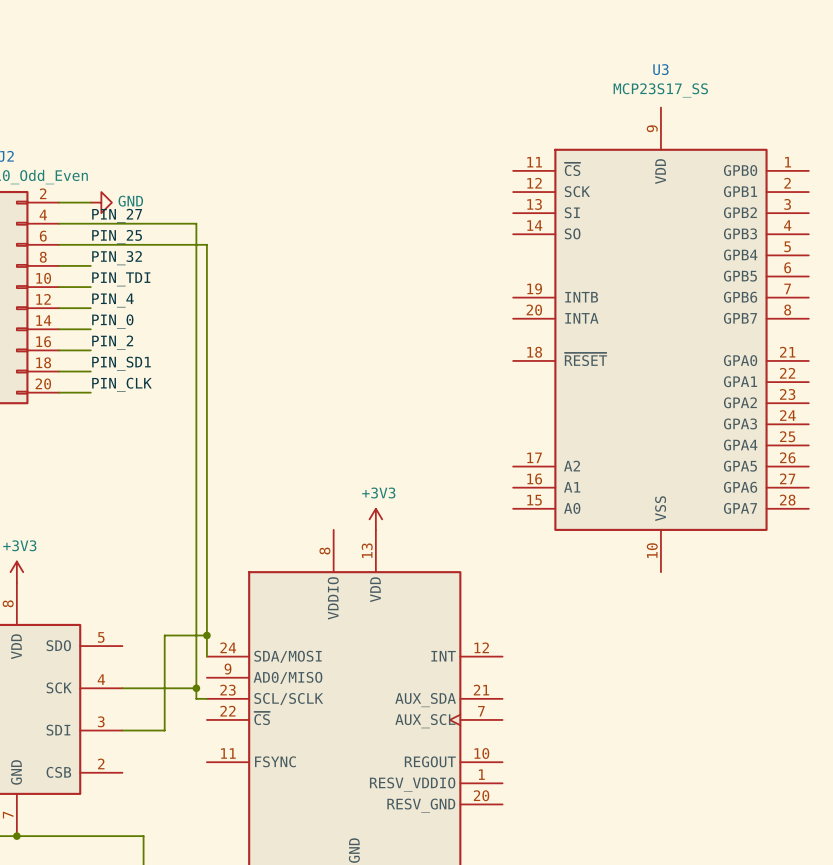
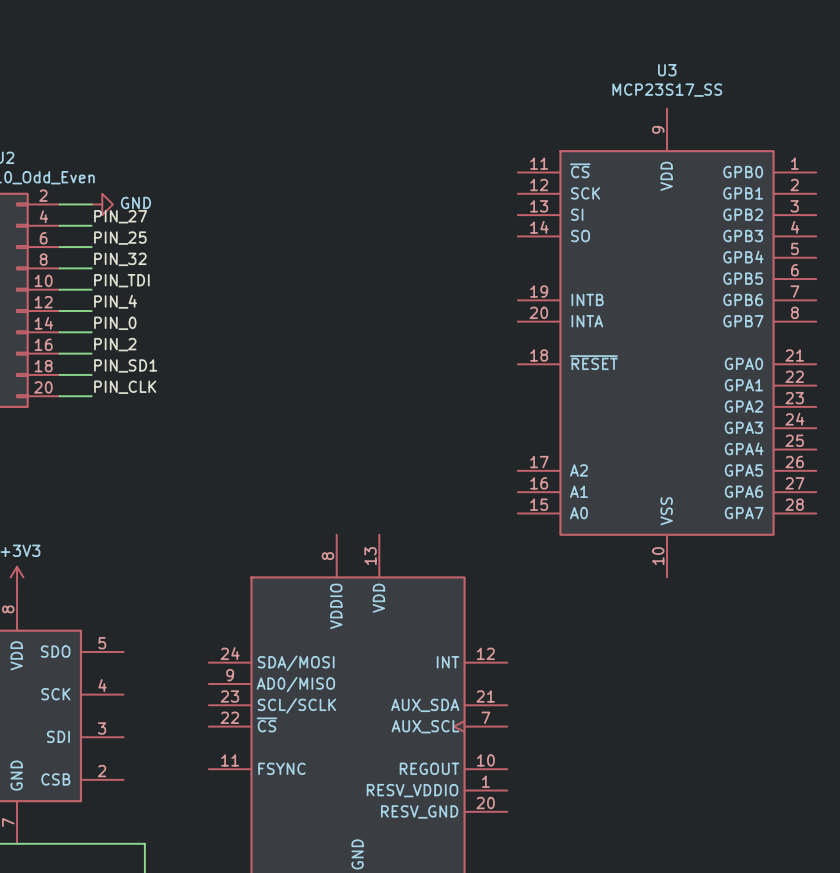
wire: (90, 223) (196, 223) (196, 698) (206, 698) -> none
wire: (90, 244) (206, 244) (206, 656) -> none
power symbol: +3V3 (375, 519) -> none
wire: (206, 635) (164, 635) (164, 730) (122, 730) -> none
junction: (206, 635) -> none
wire: (122, 688) (196, 688) -> none
junction: (196, 688) -> none
junction: (16, 836) -> none

